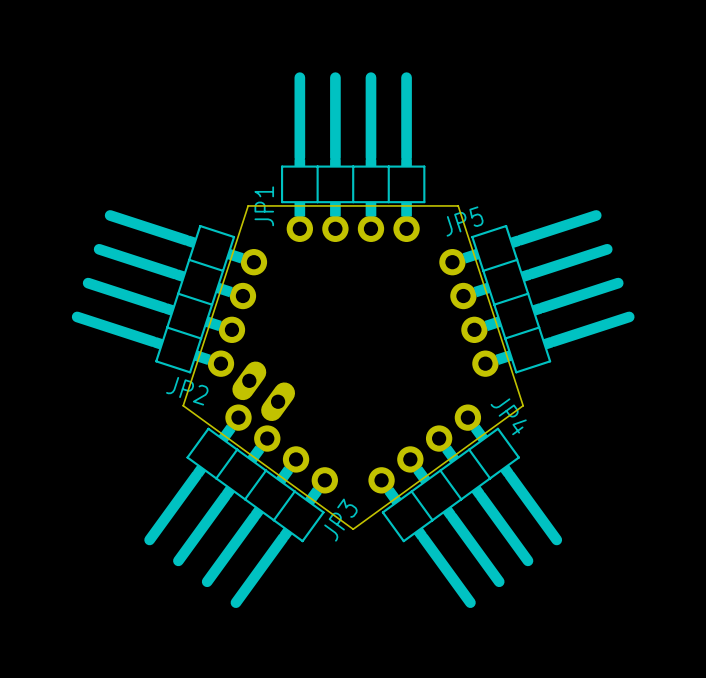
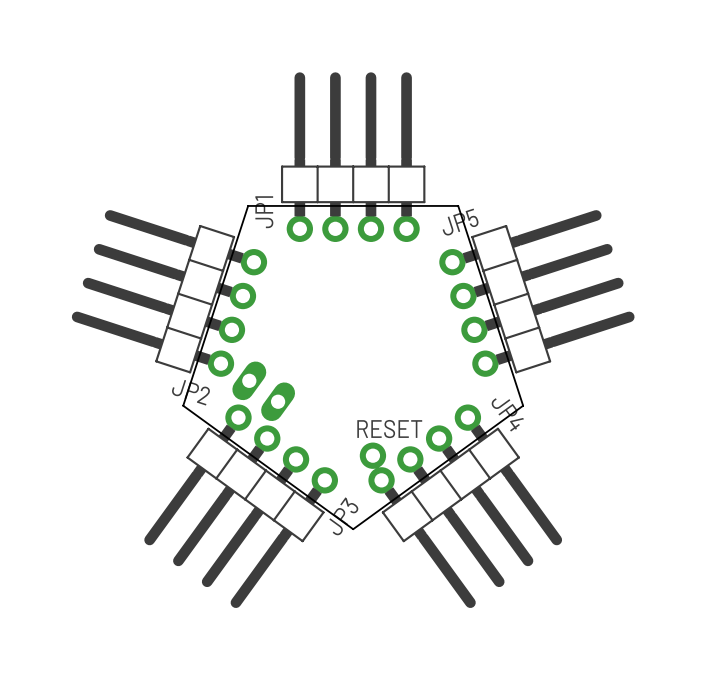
RESET: none -> (372, 455)

